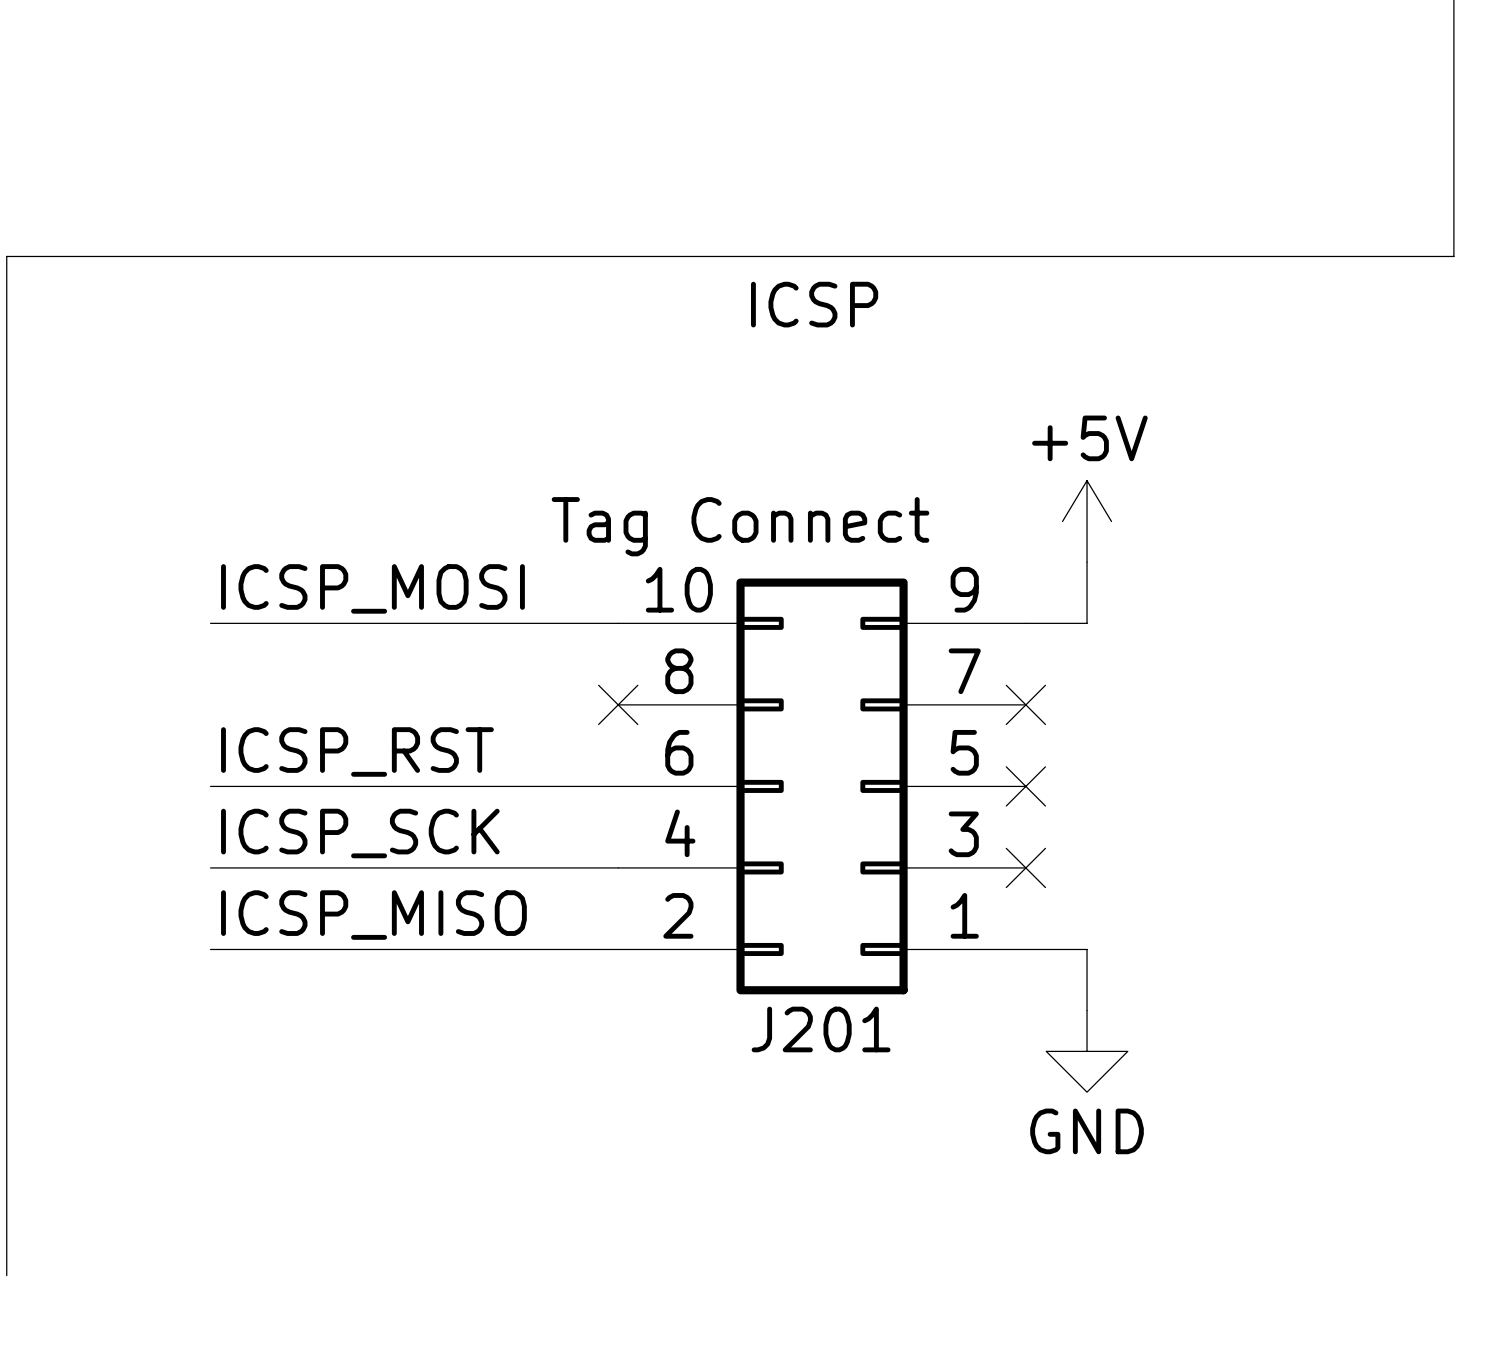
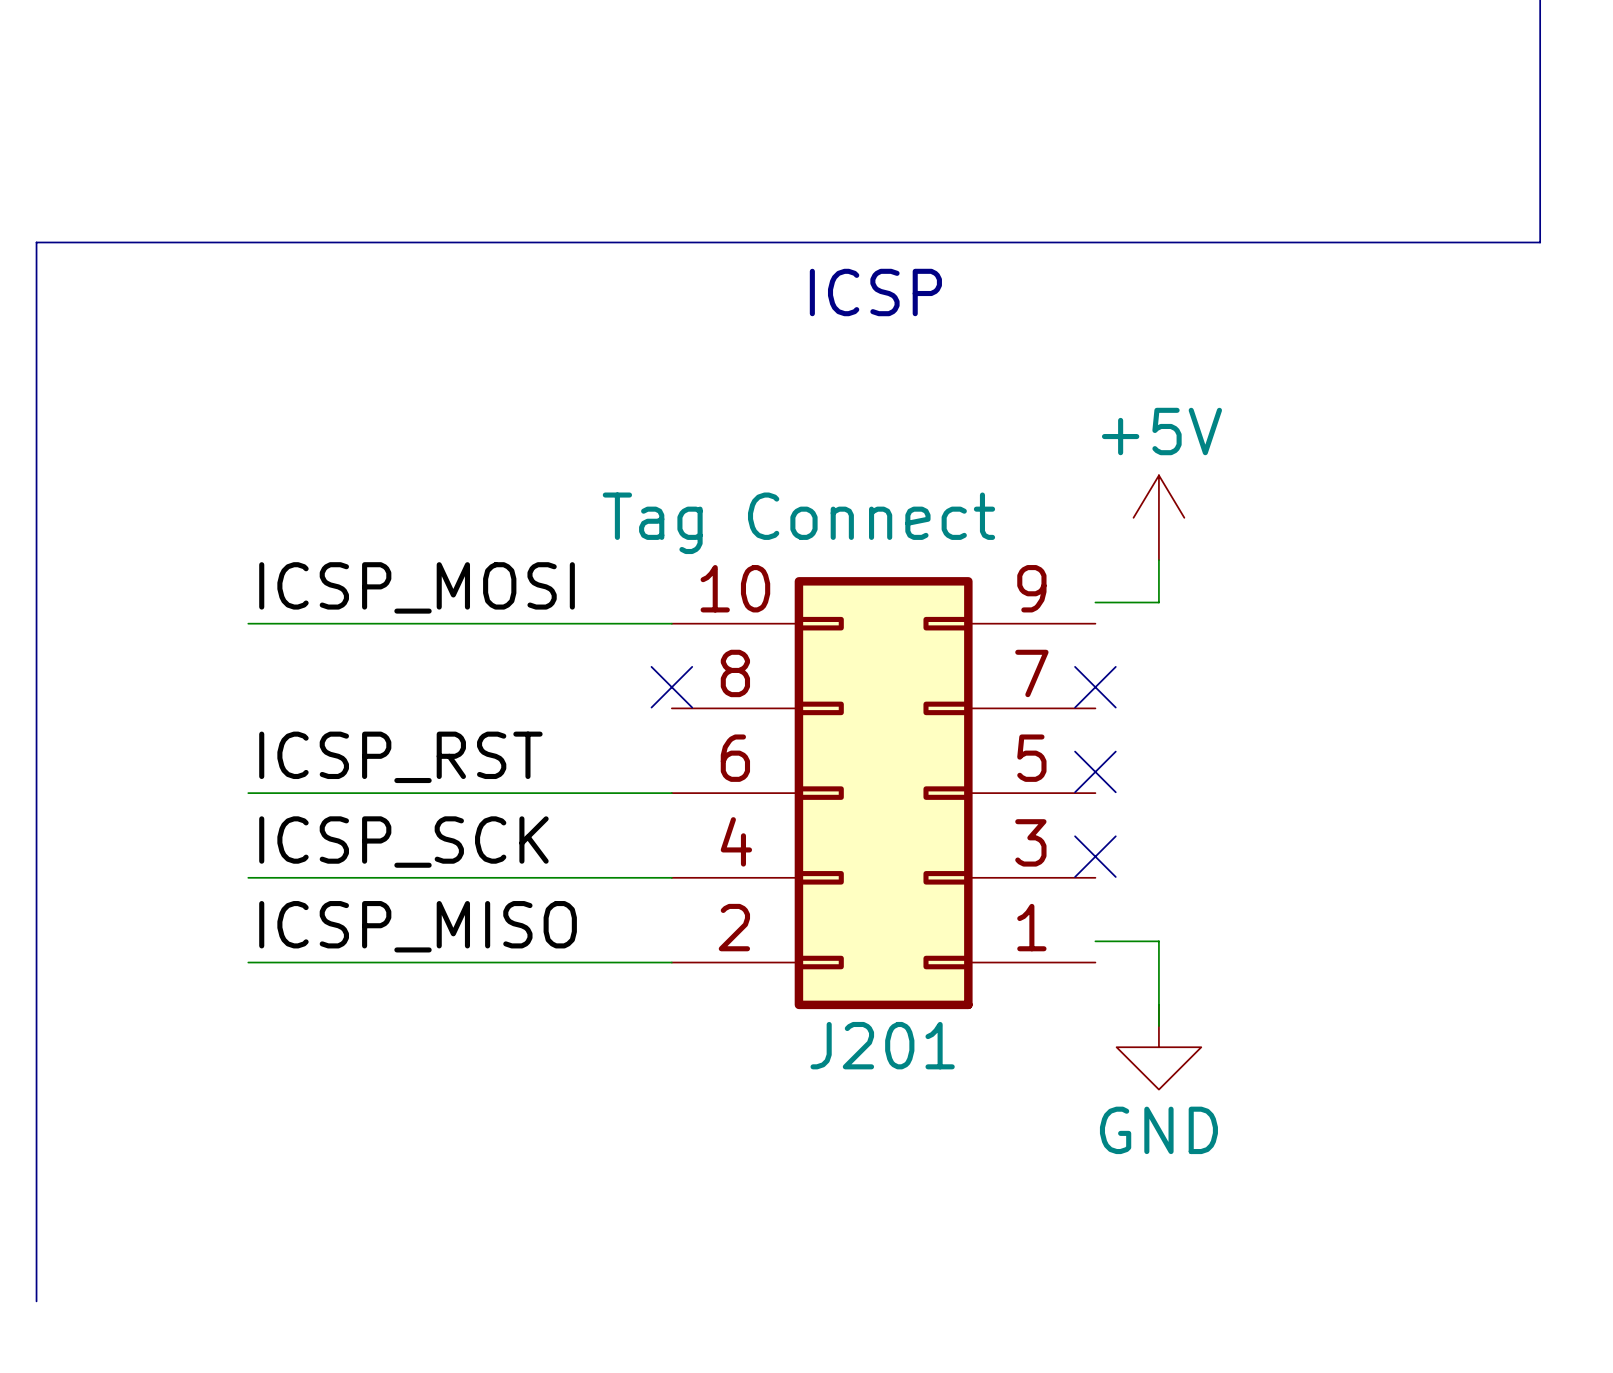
wire: (1087, 602) (1087, 623) (1025, 623) -> (1158, 602) (1095, 602)
no-connect mark position: (618, 704) -> (671, 687)
no-connect mark position: (1025, 704) -> (1095, 687)
no-connect mark position: (1025, 786) -> (1095, 771)
no-connect mark position: (1025, 867) -> (1095, 856)
wire: (1025, 949) (1087, 949) -> (1095, 941) (1158, 941) (1158, 962)
power symbol position: GND (1087, 1051) -> GND (1158, 1047)

